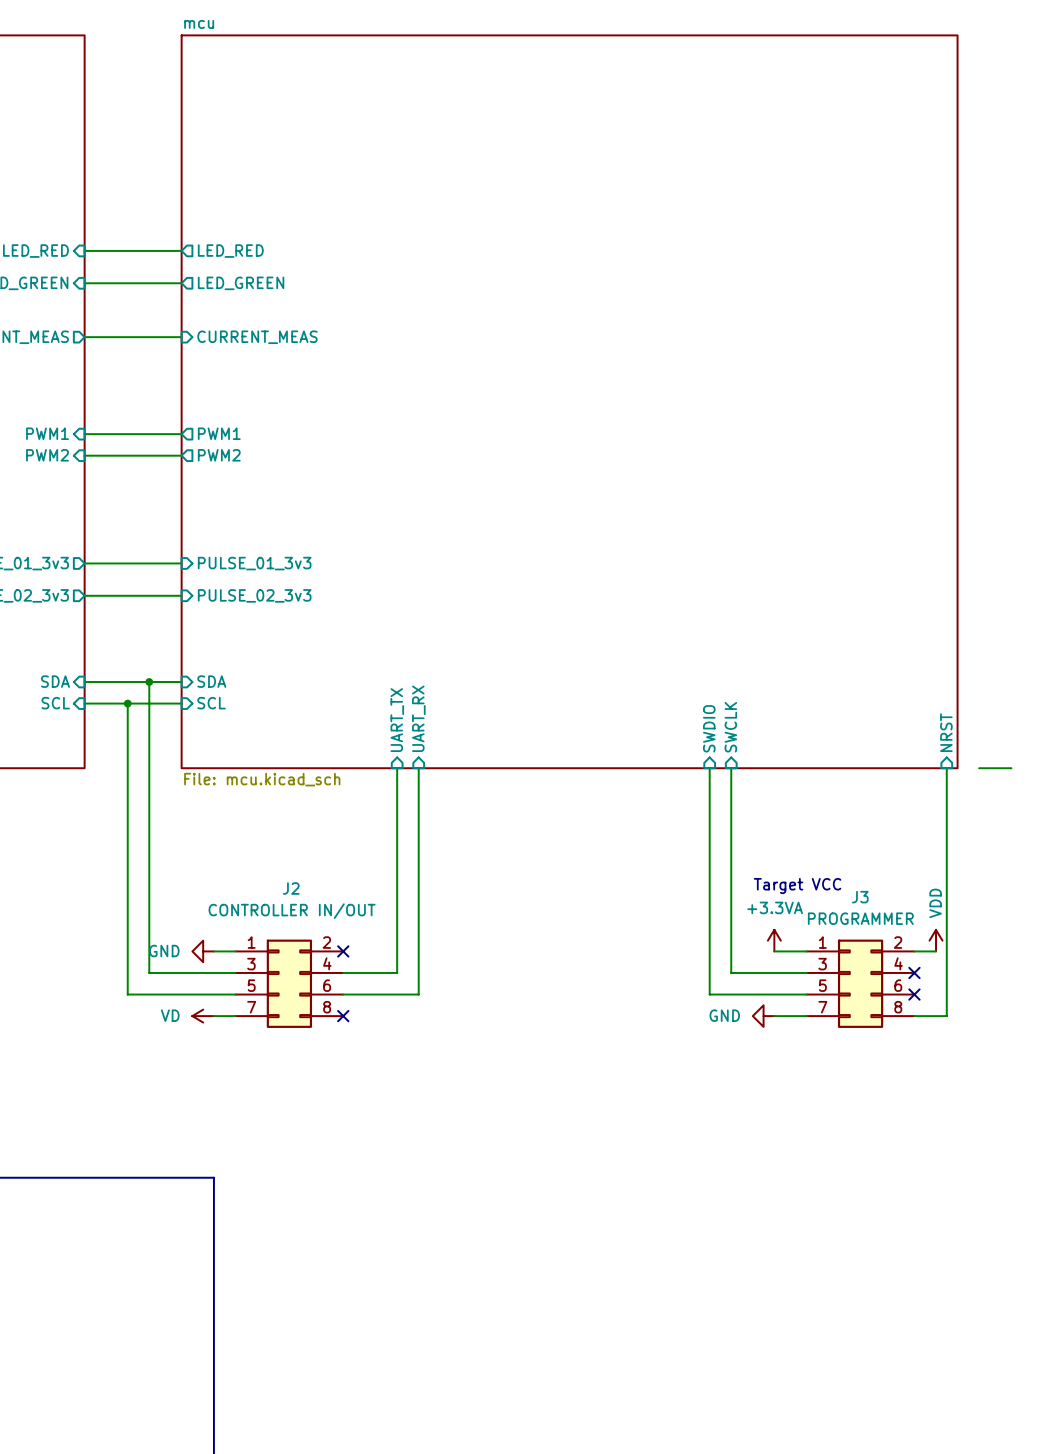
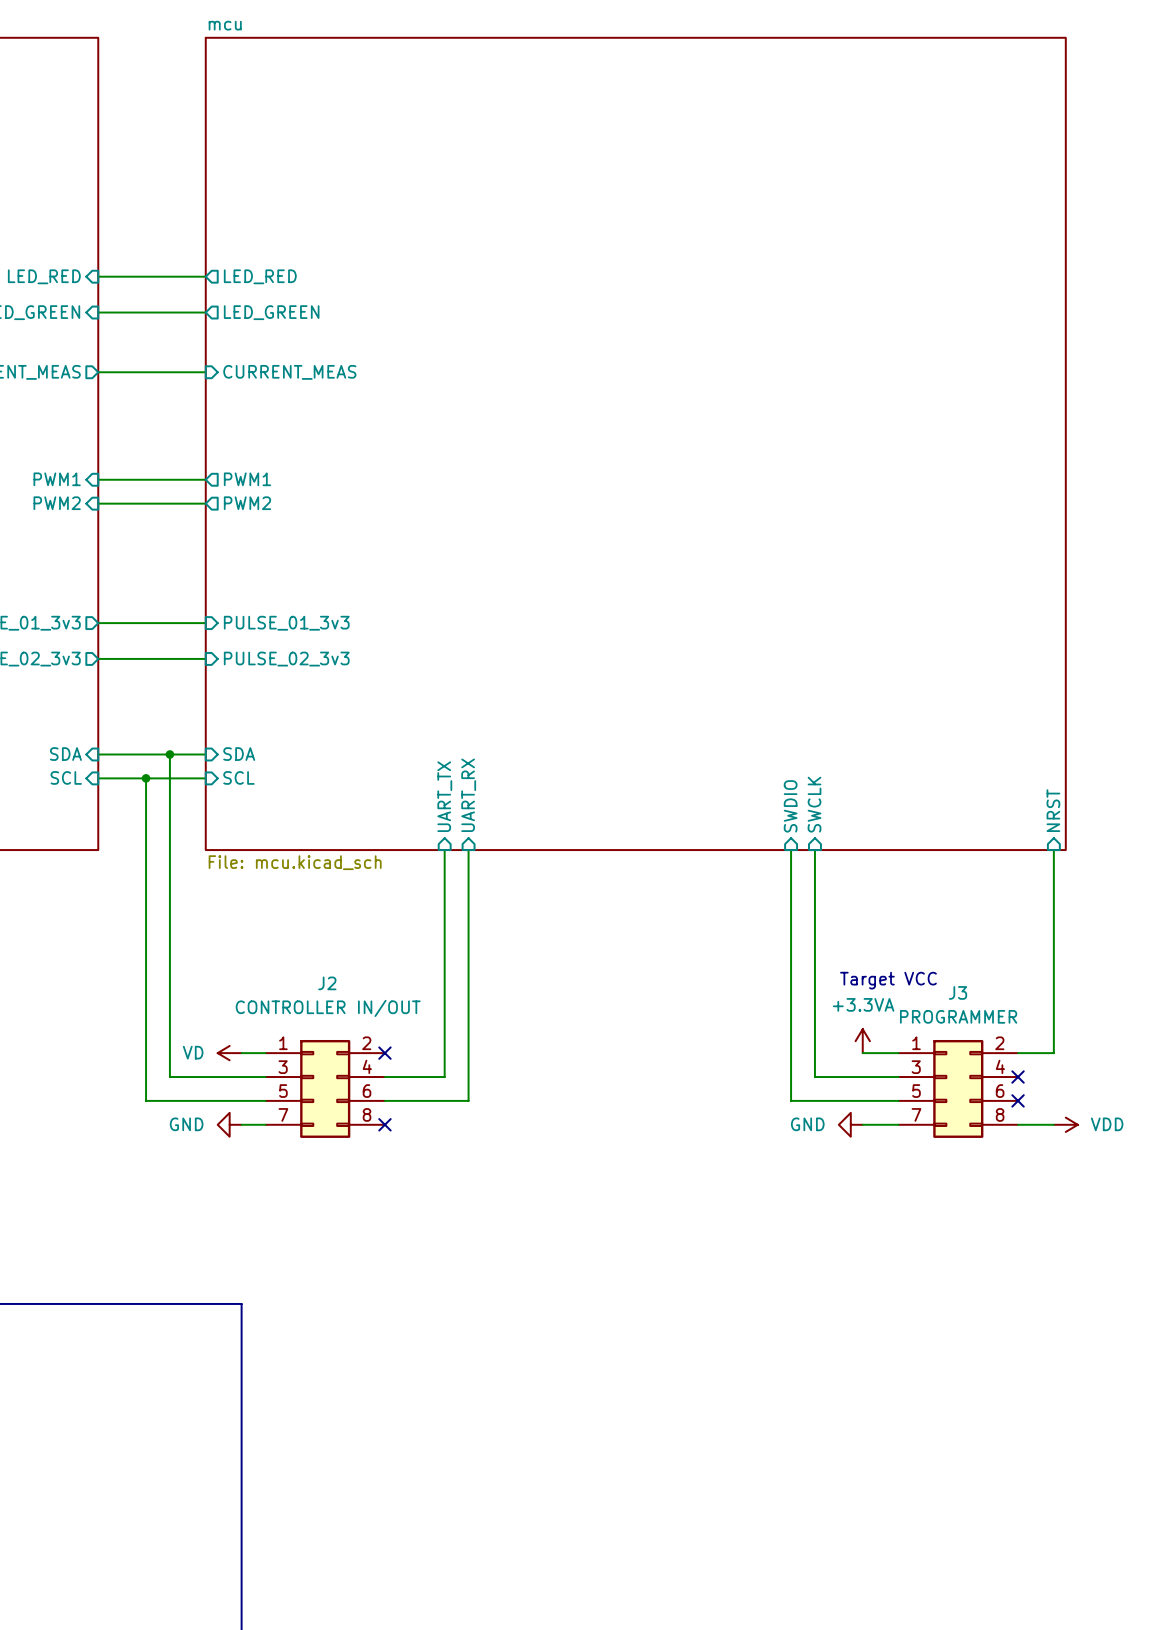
wire: (979, 768) (1011, 768) -> none
power symbol rotation: 0° (936, 940) -> 90° clockwise (1065, 1124)
power symbol position: VDD (936, 940) -> VDD (1065, 1124)
power symbol: GND (203, 951) -> VD (229, 1053)
wire: (946, 951) (946, 1016) -> (1053, 1053) (1041, 1053)
power symbol: VD (203, 1016) -> GND (229, 1124)

